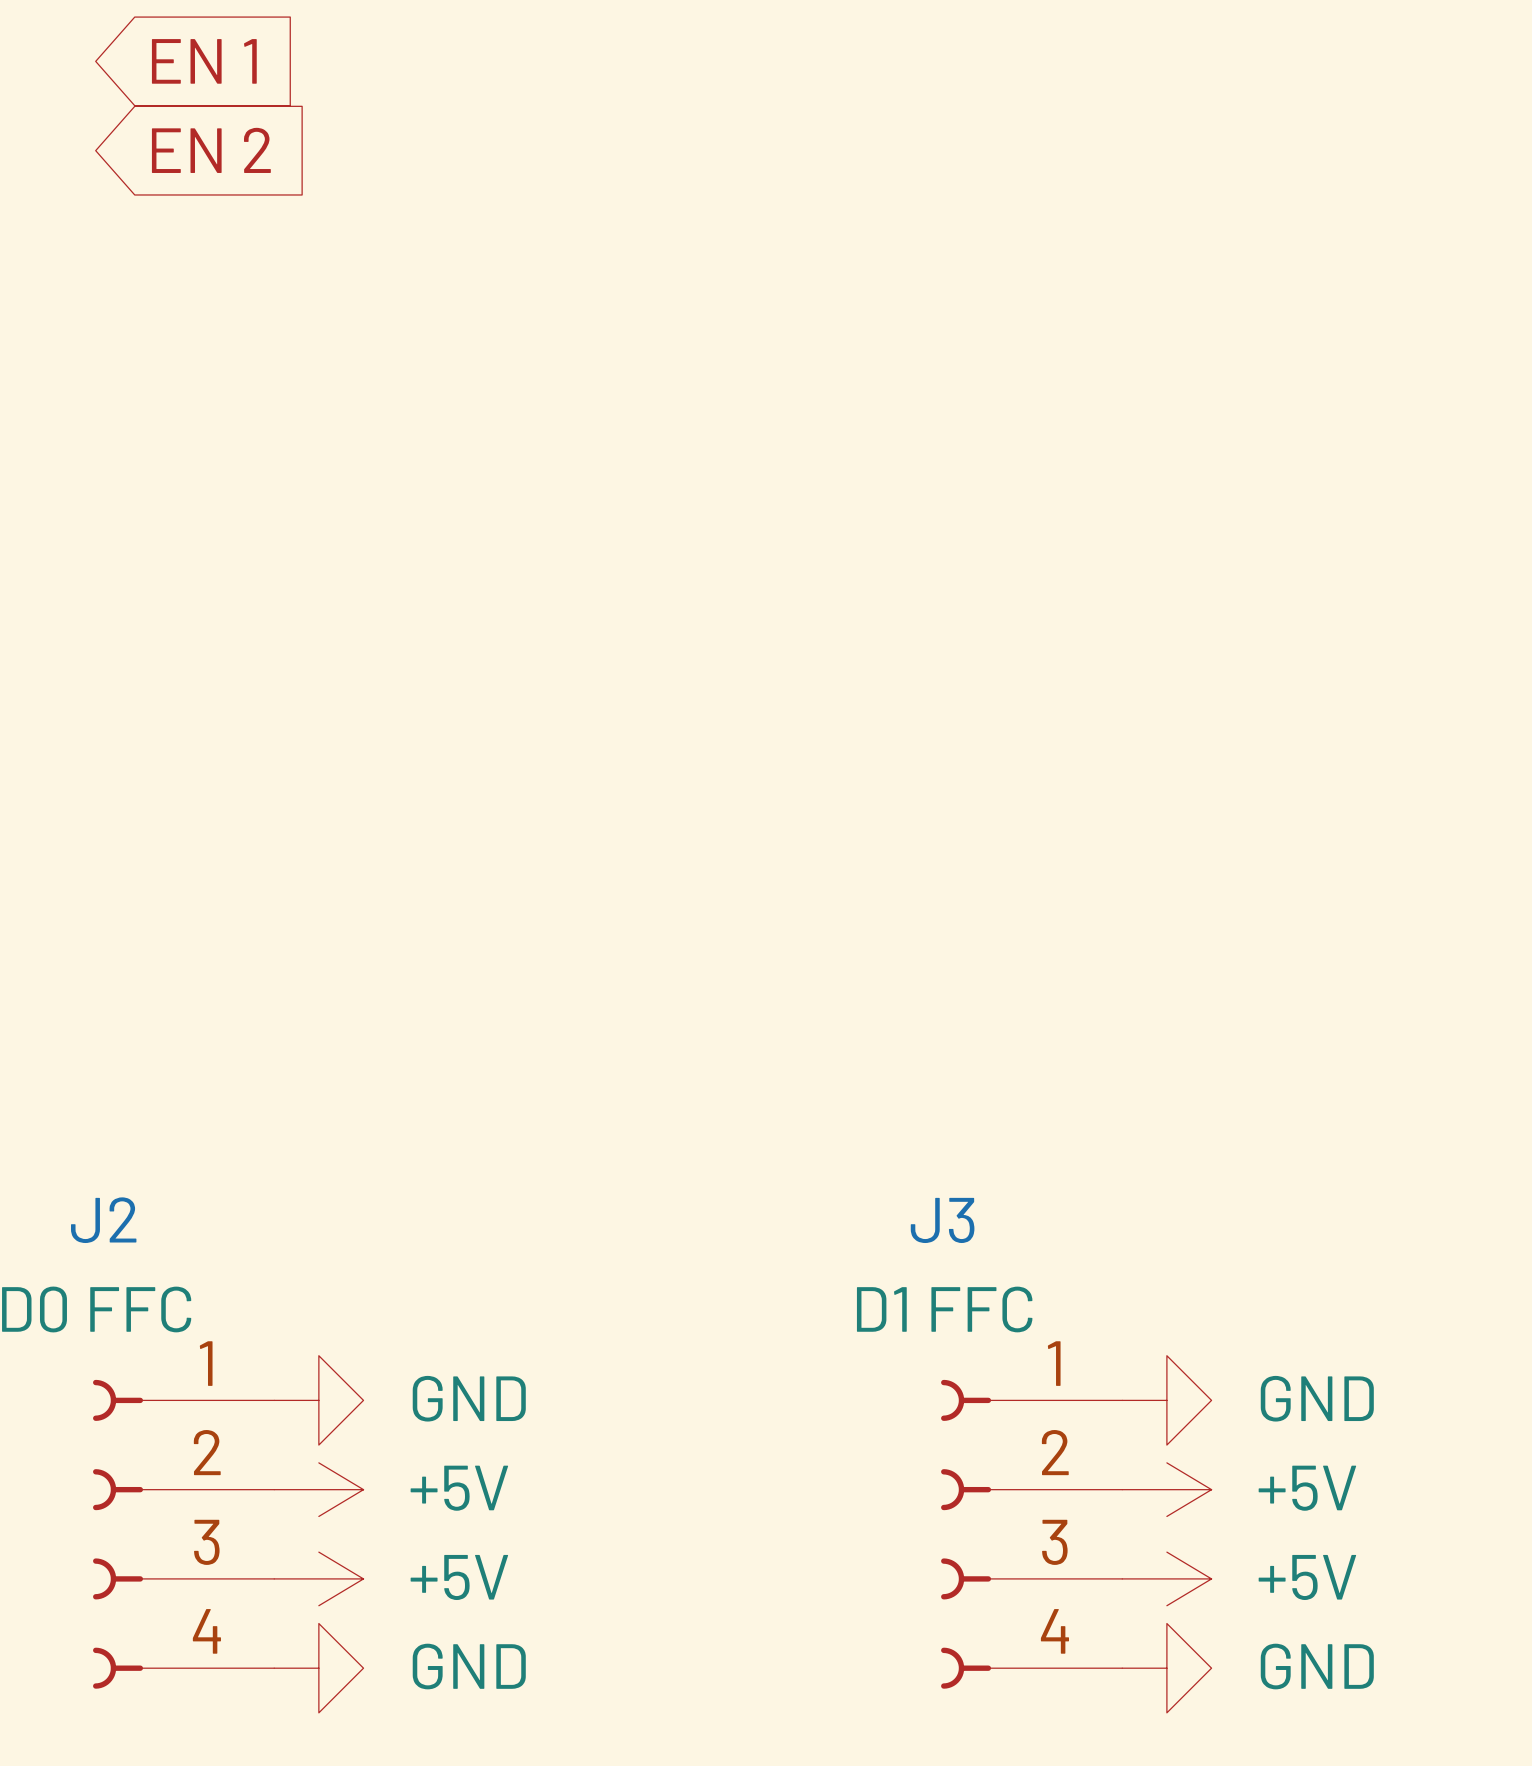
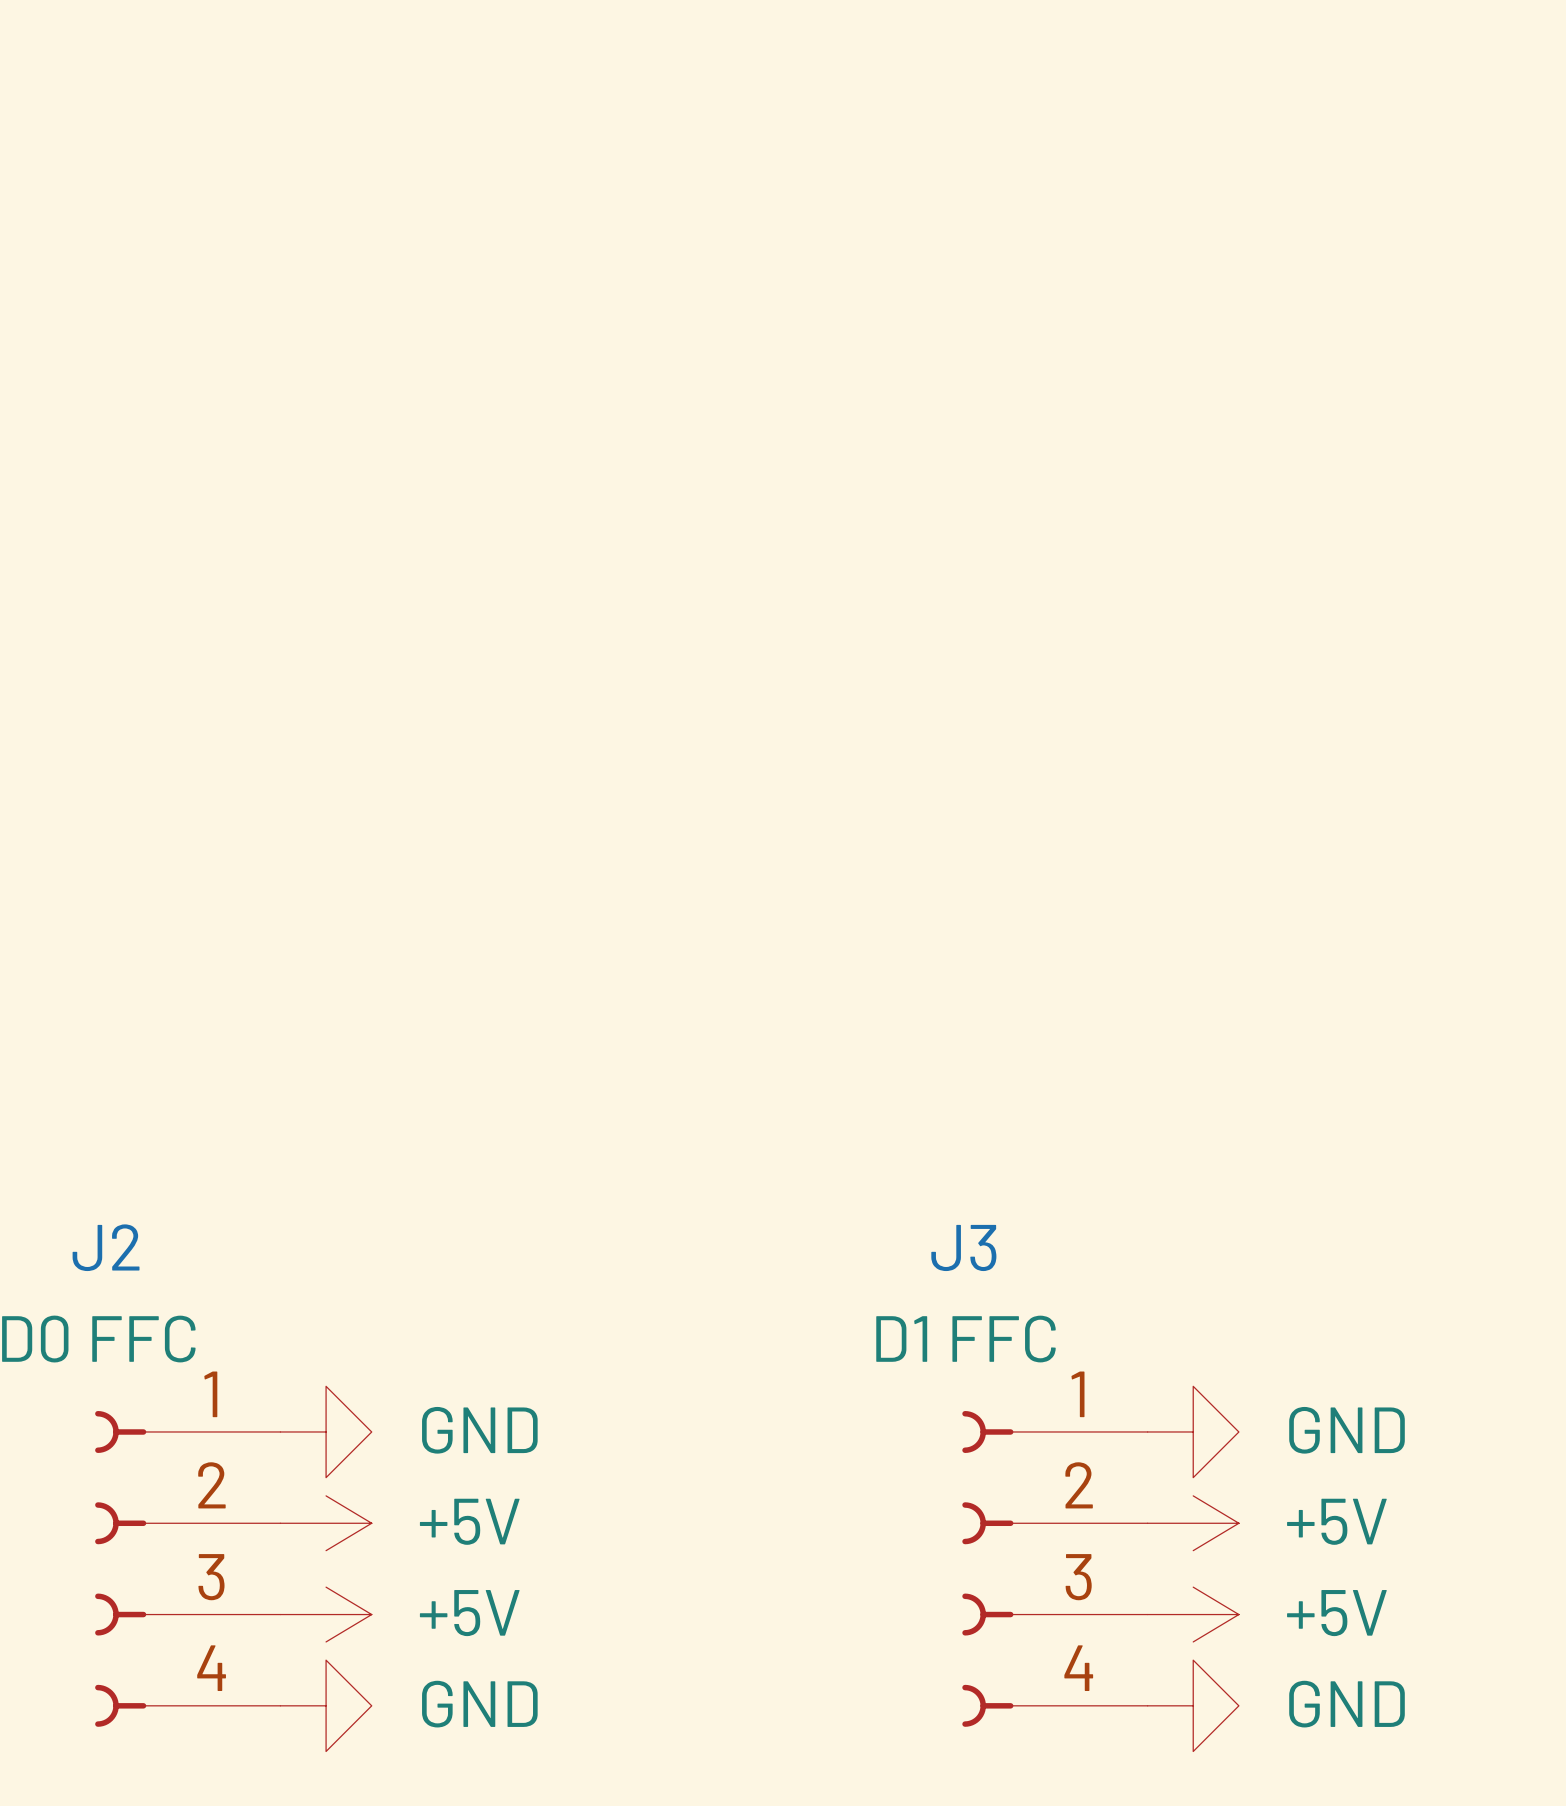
global label: EN 1 (204, 61) -> none
global label: EN 2 (211, 150) -> none

